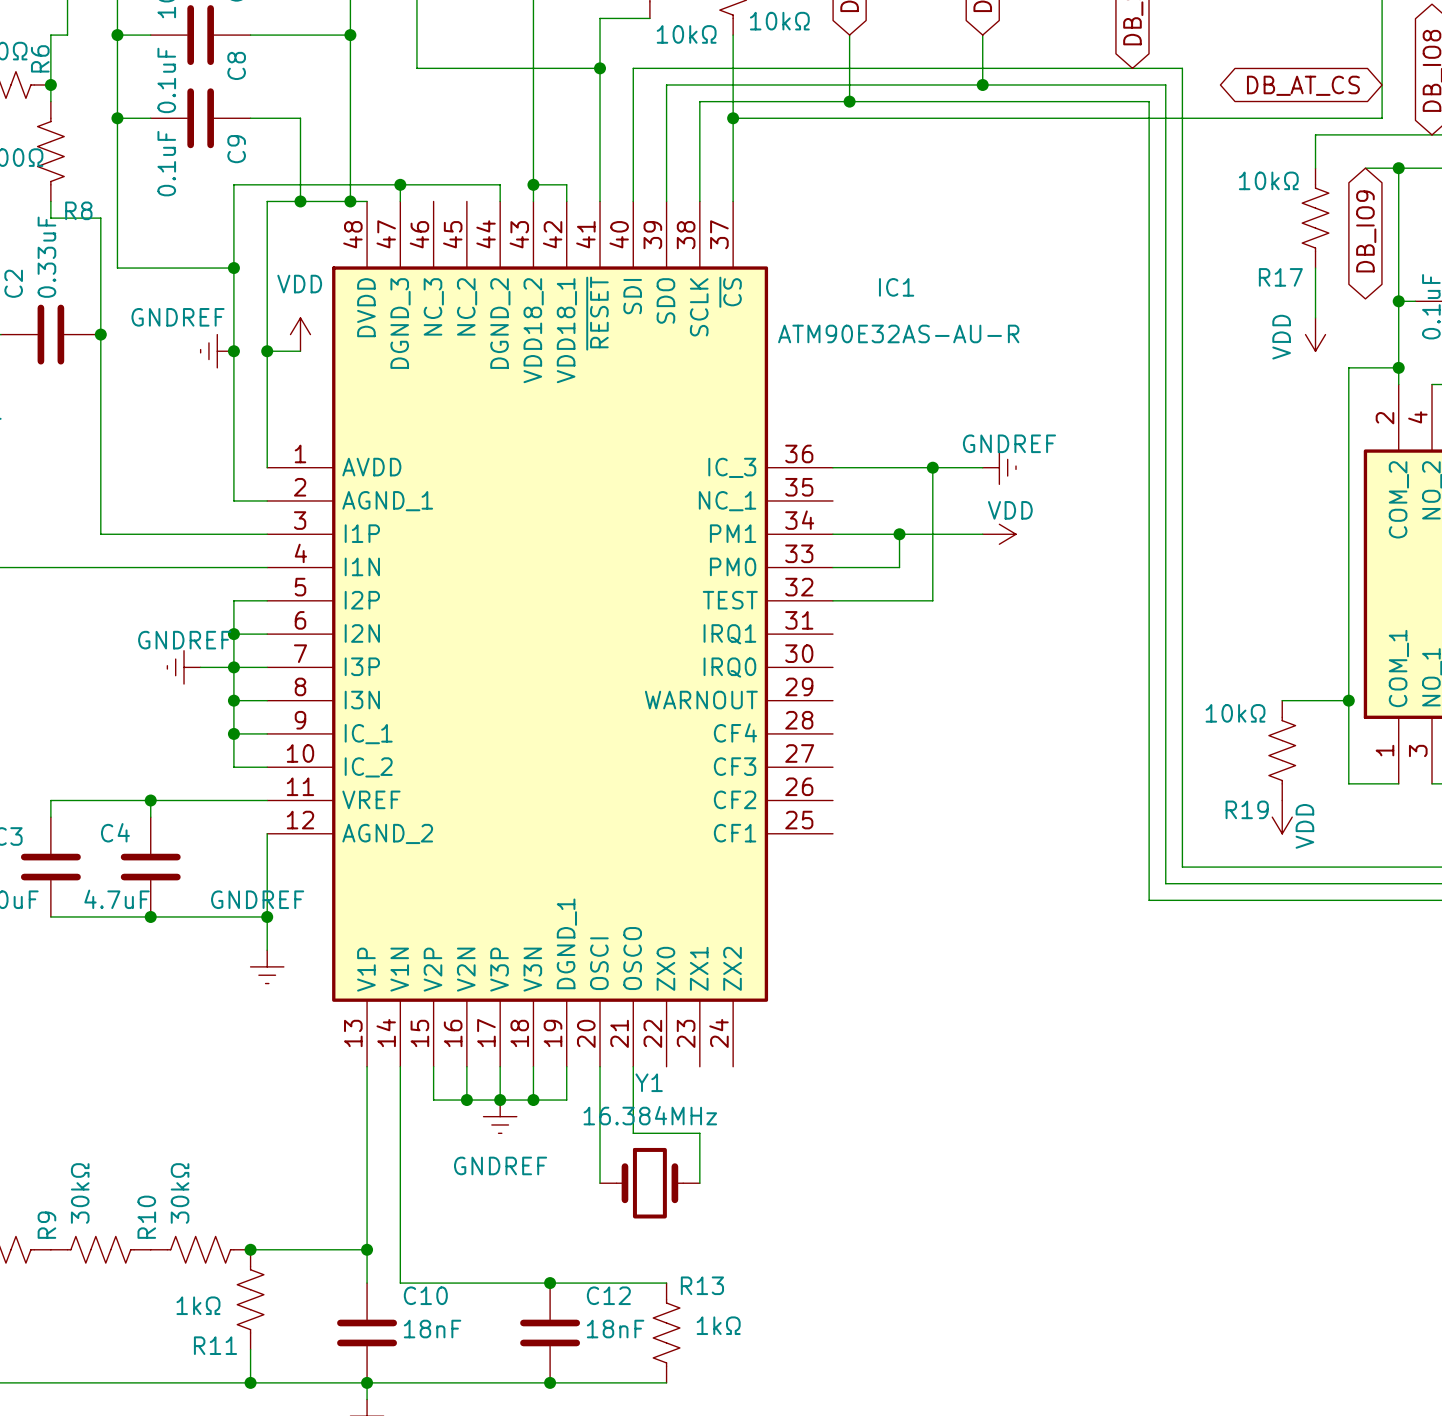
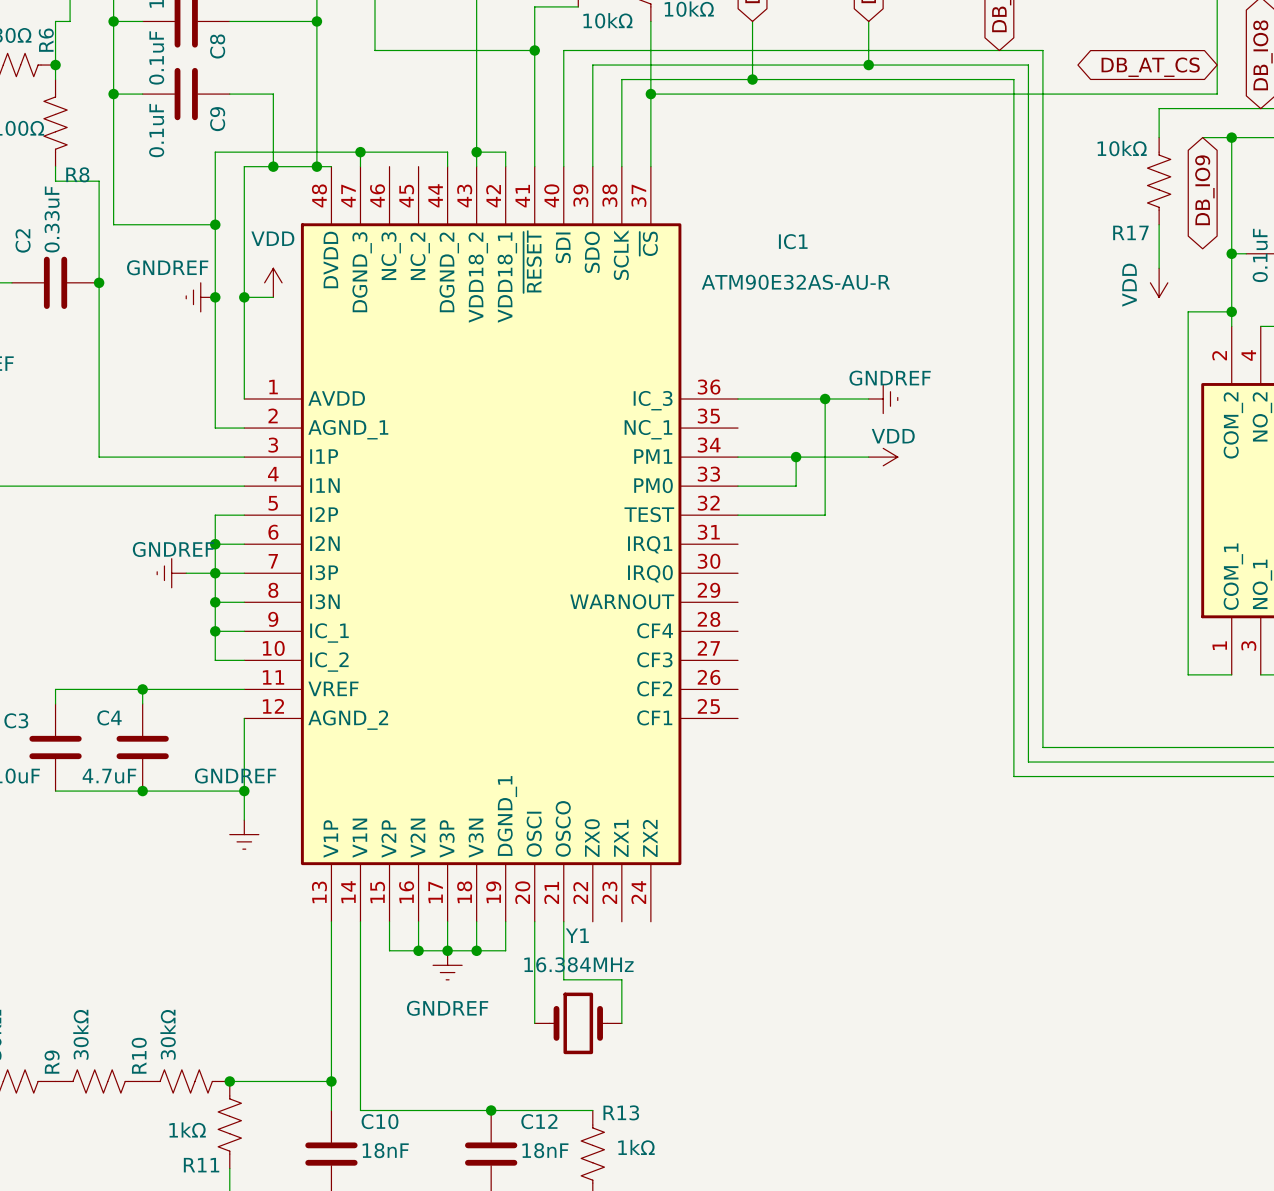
wire: (1282, 700) (1348, 700) -> none
junction: (1348, 700) -> none
R19: 10kΩ (1282, 750) -> none
power symbol: VDD (1282, 817) -> none

